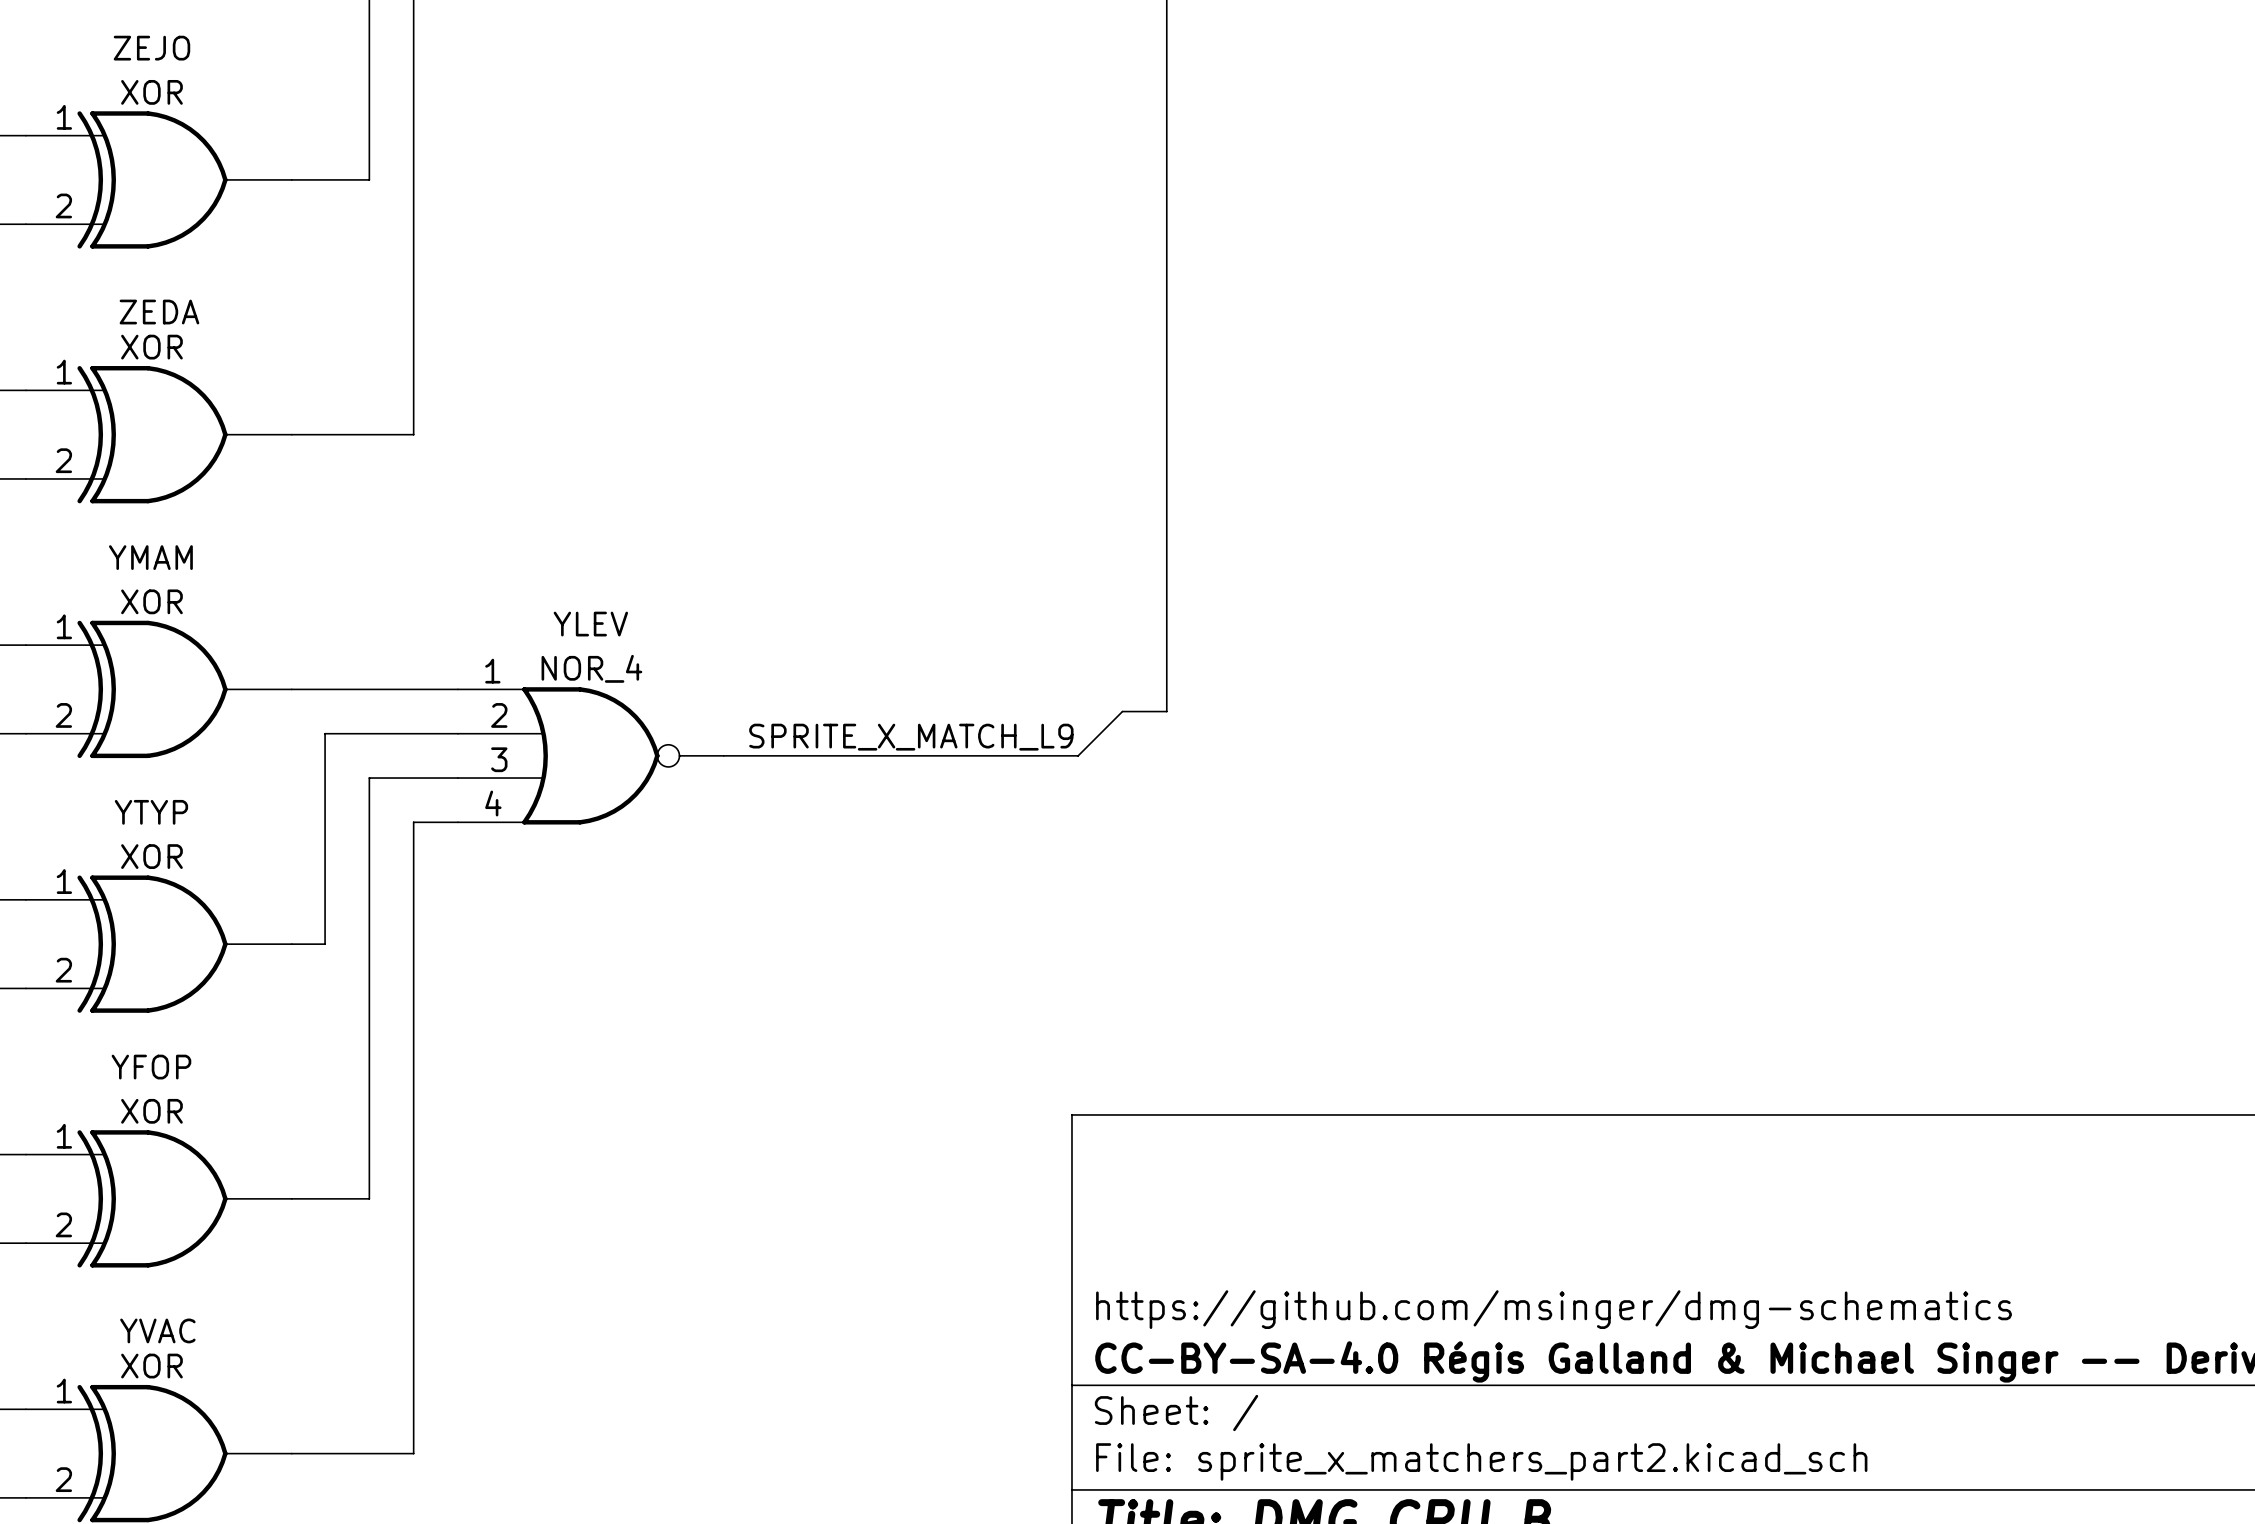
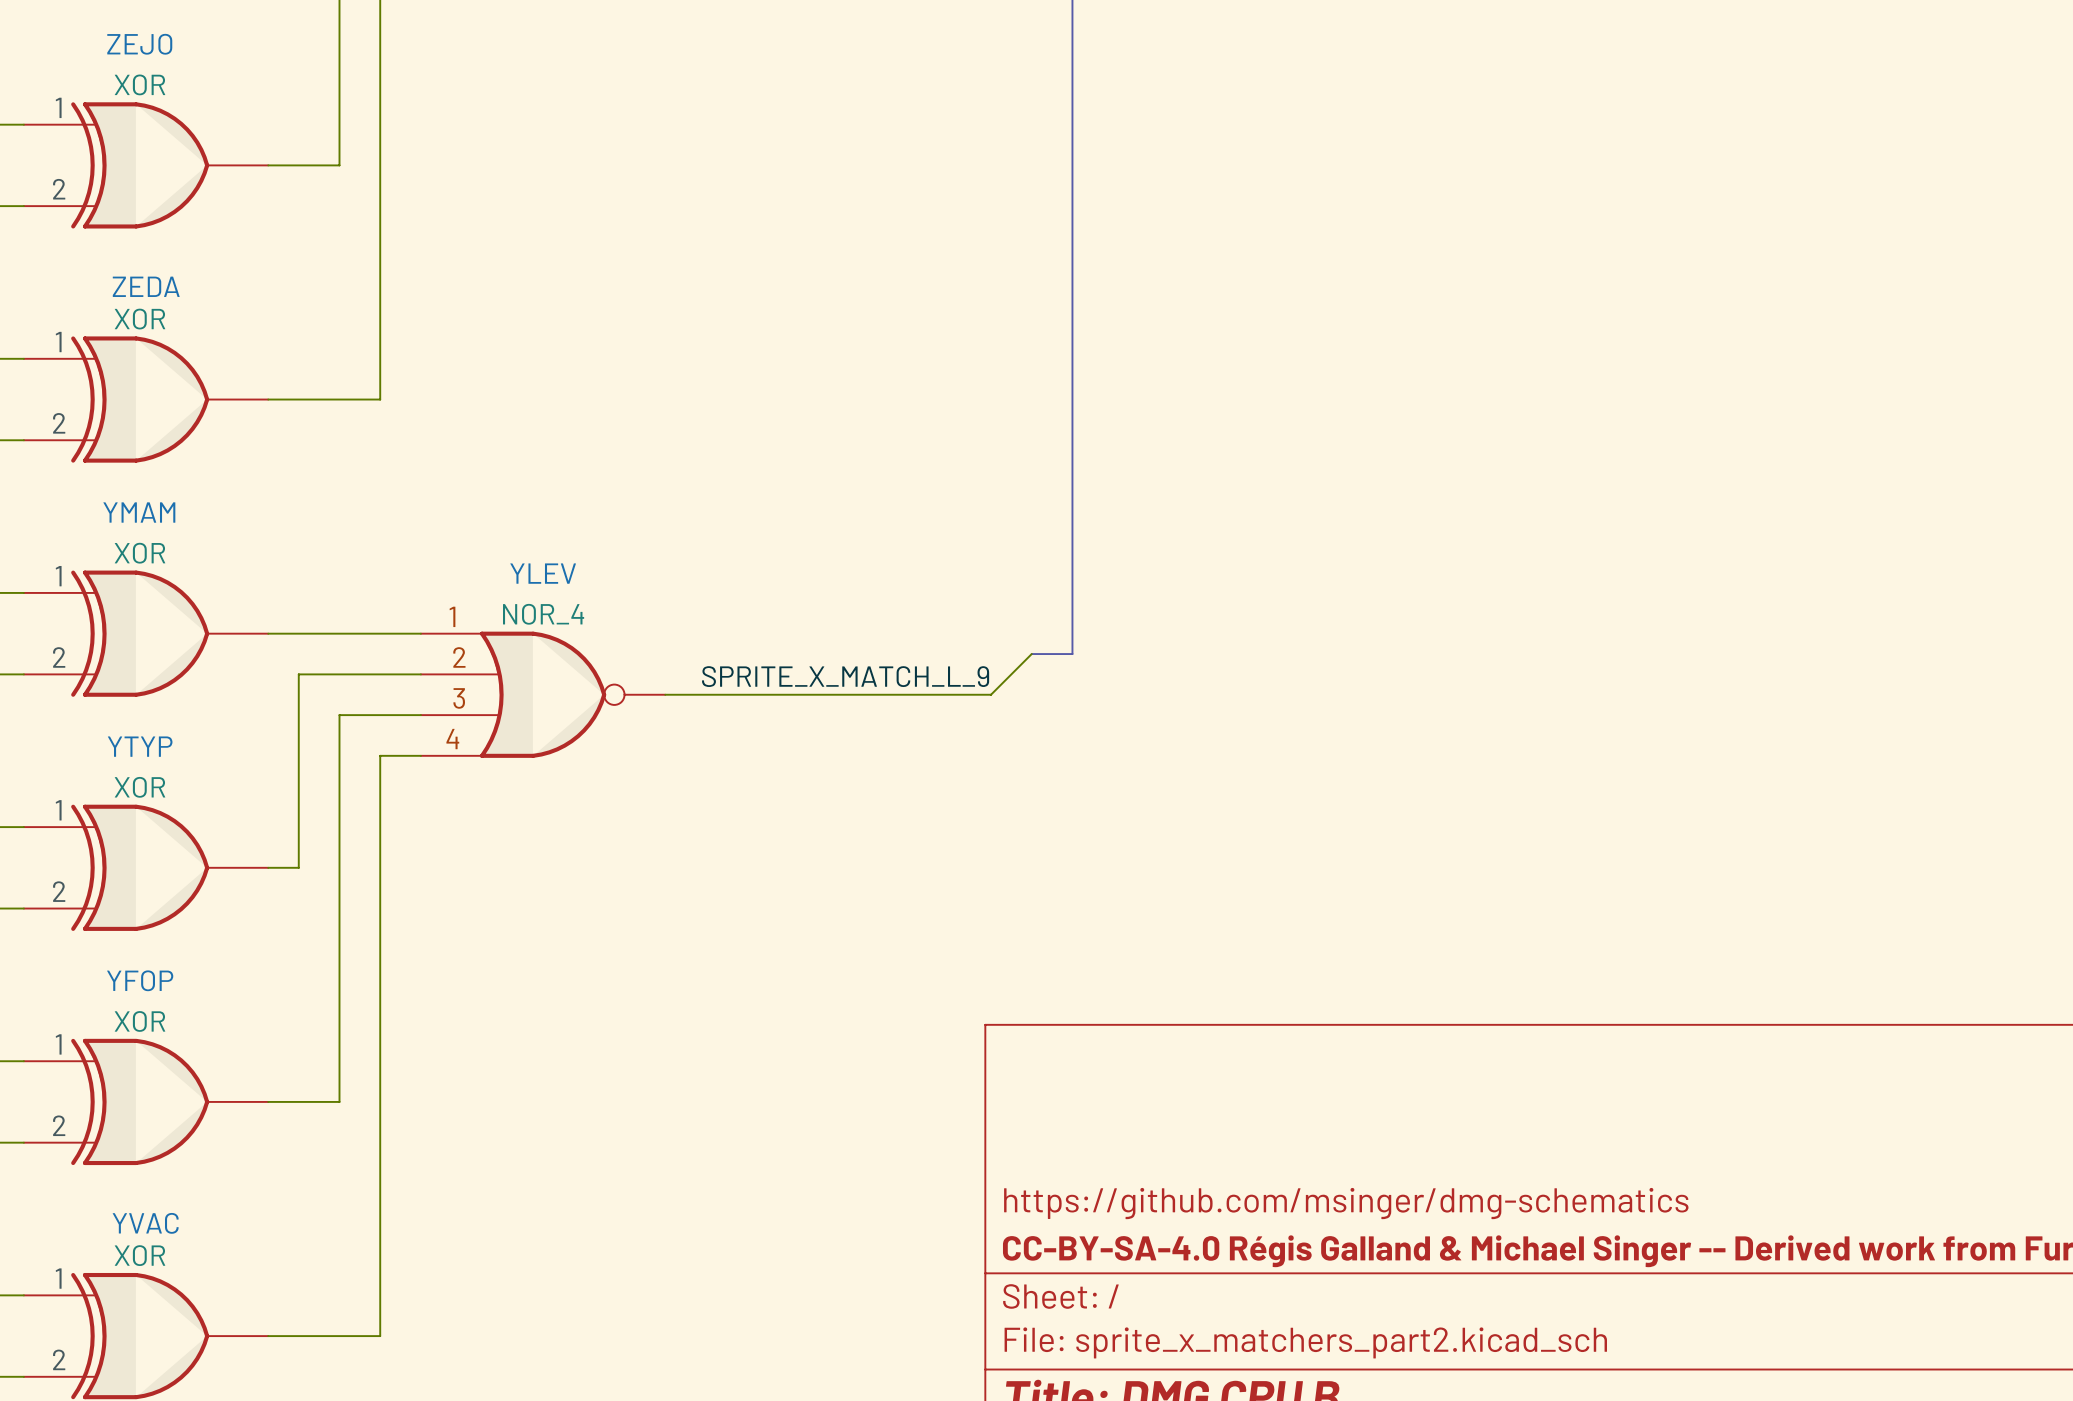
label: SPRITE_X_MATCH_L9 (911, 737) -> SPRITE_X_MATCH_L_9 (845, 676)

